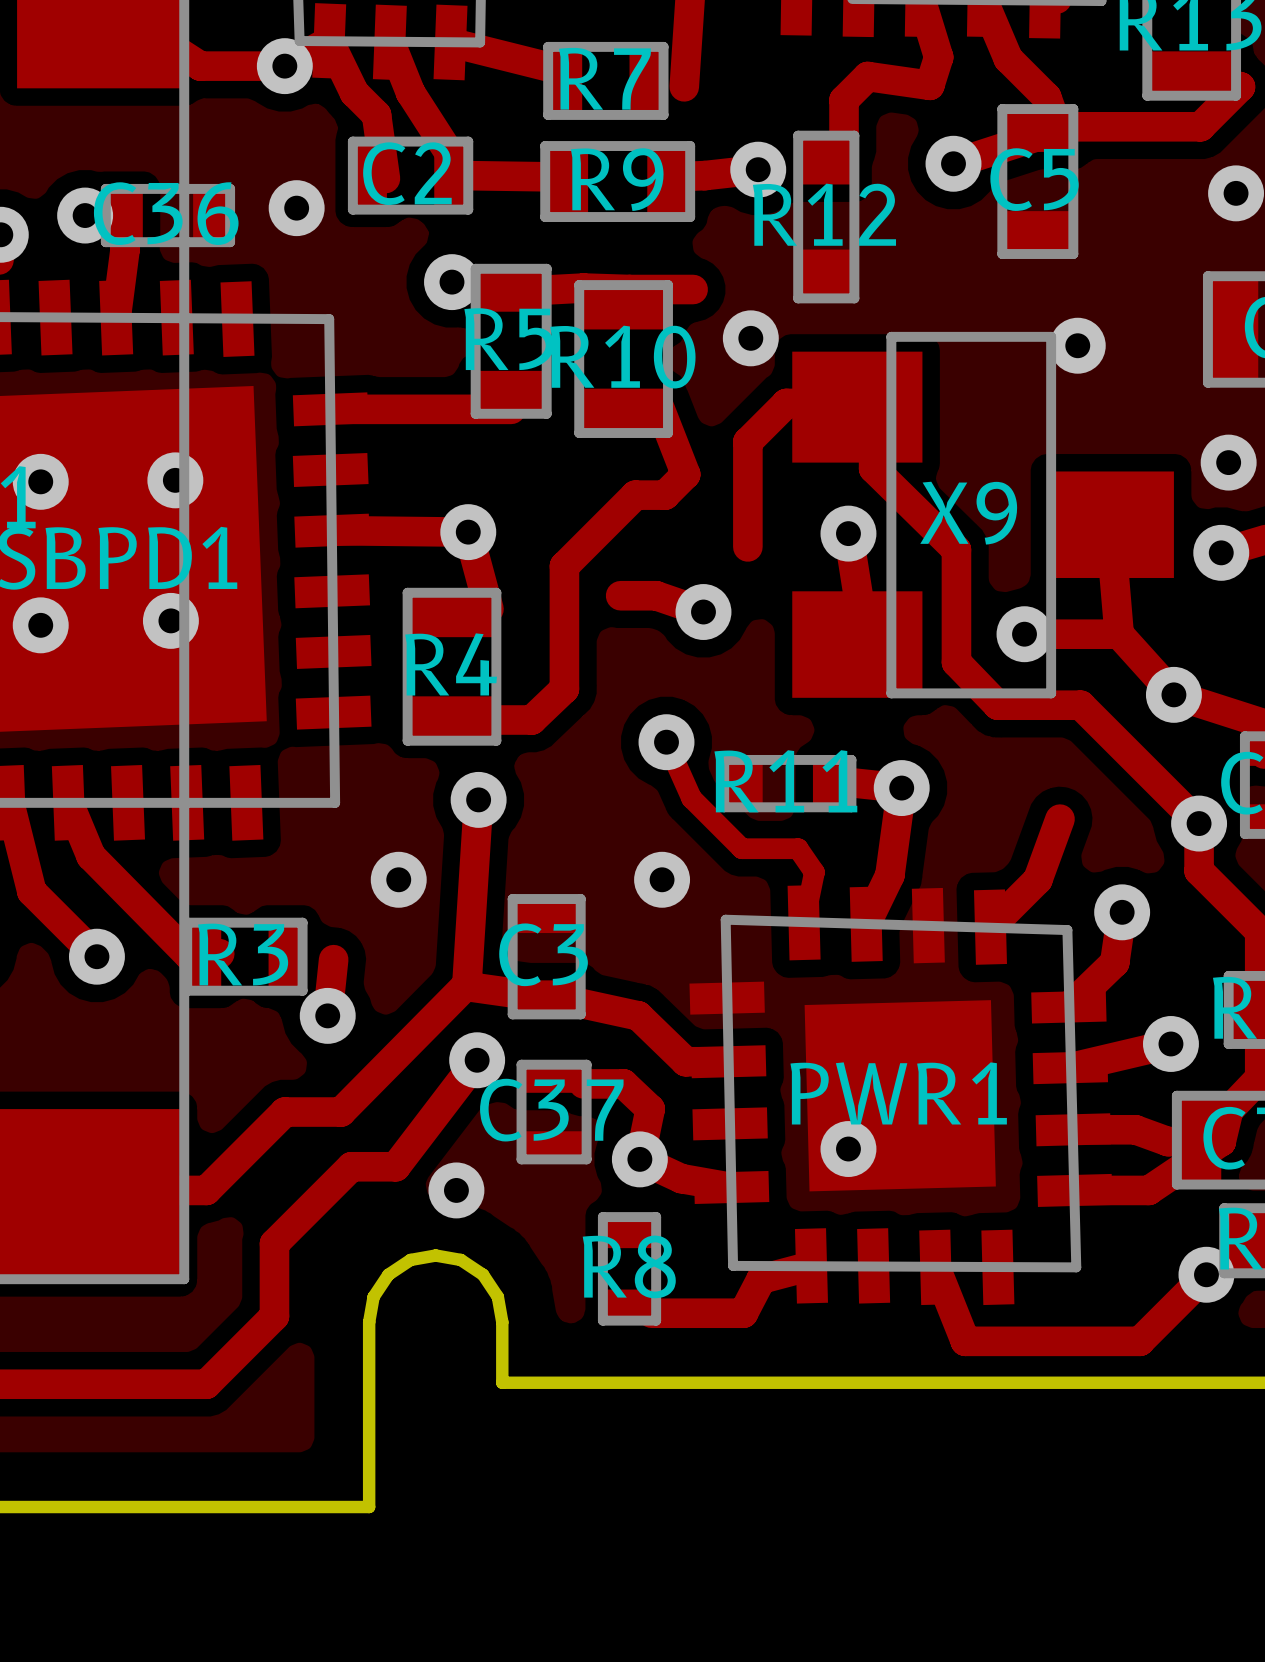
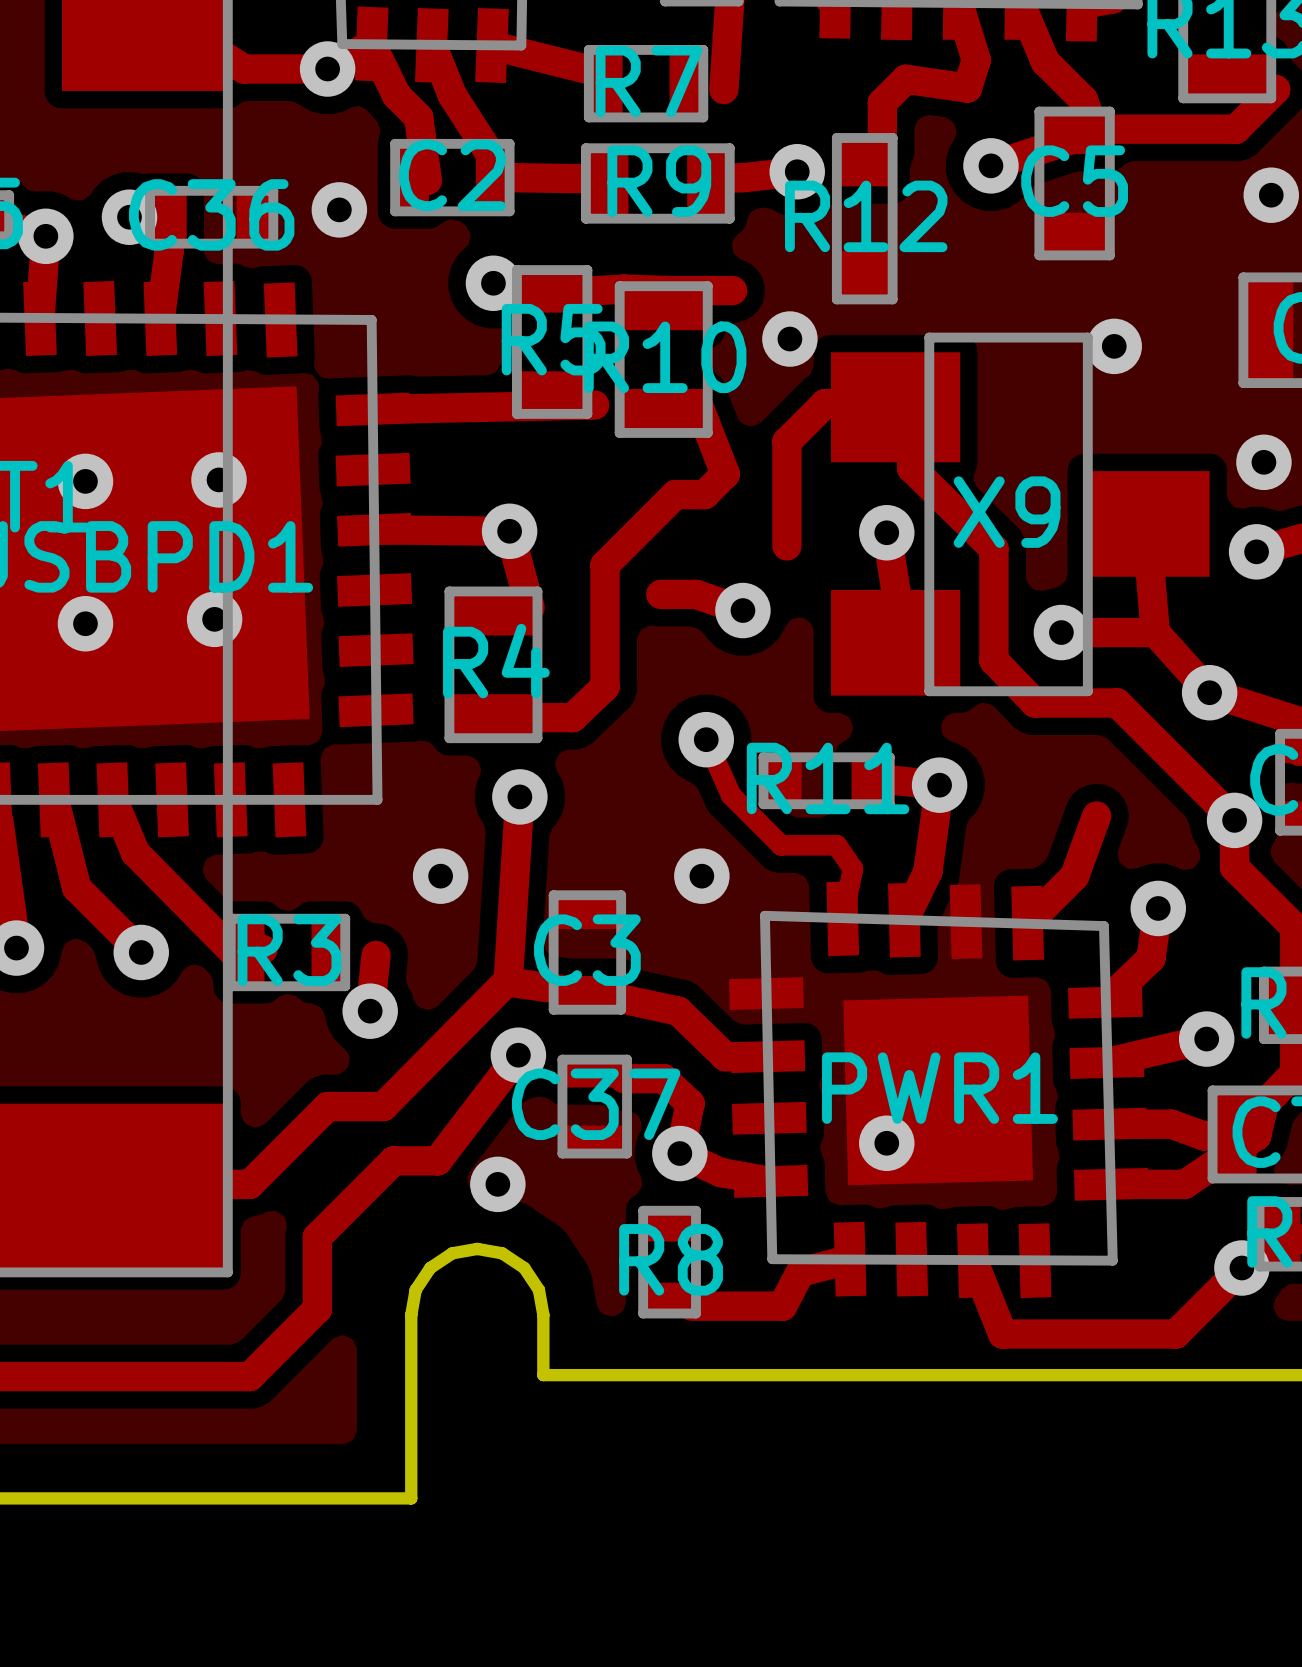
track: (330, 409) (511, 409) -> (373, 409) (594, 405)

